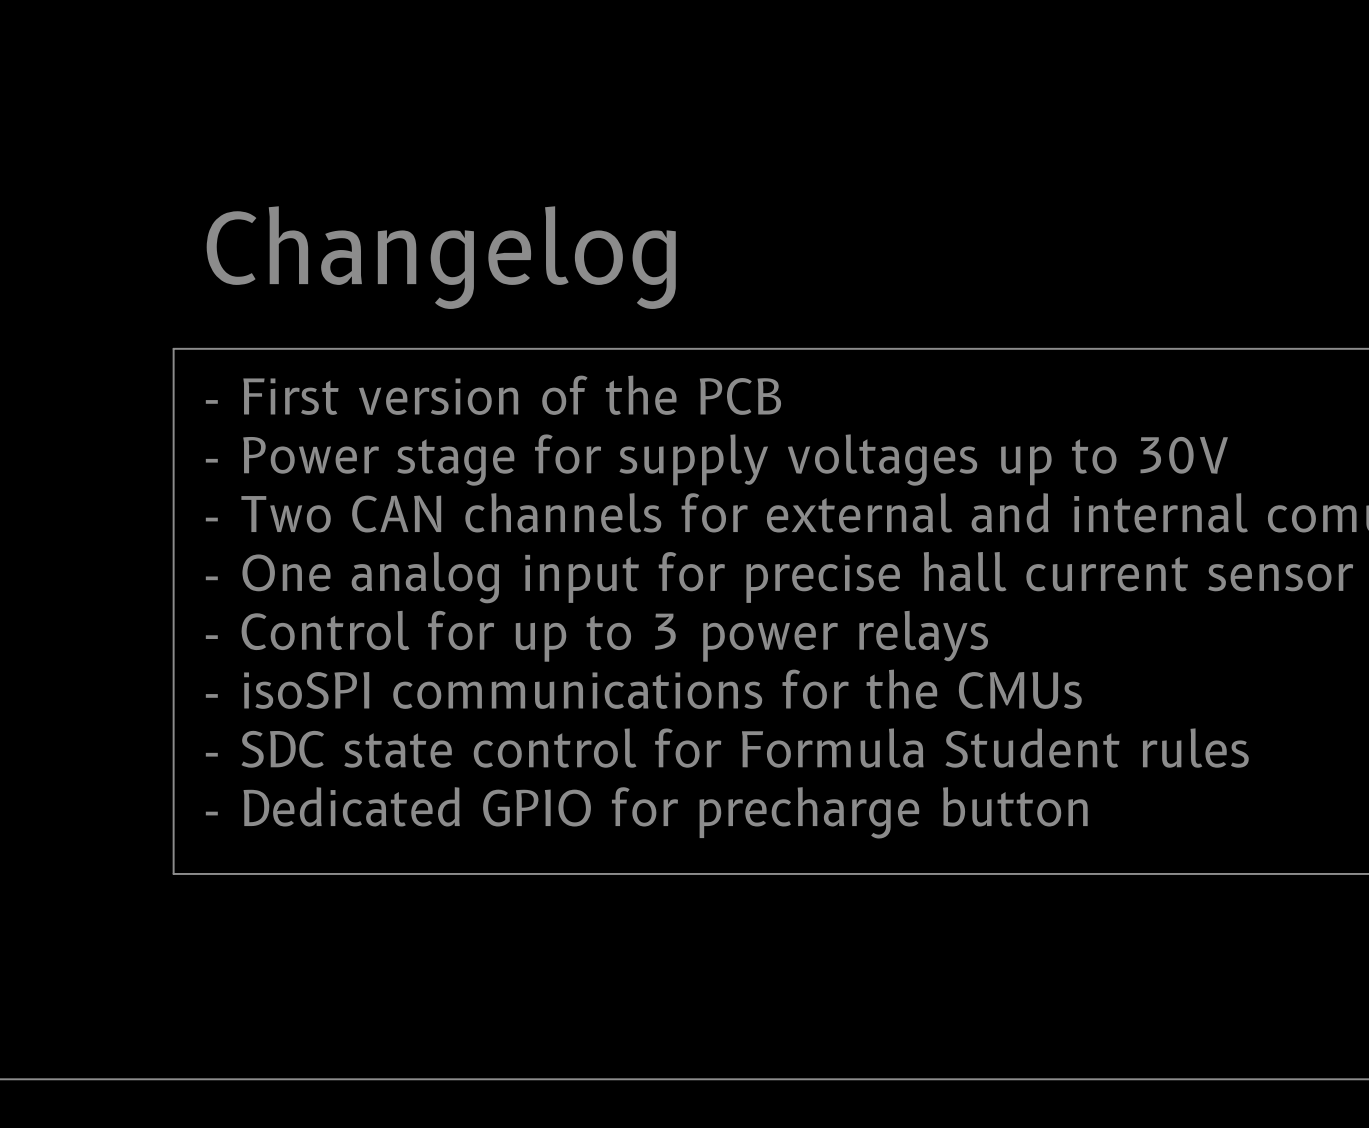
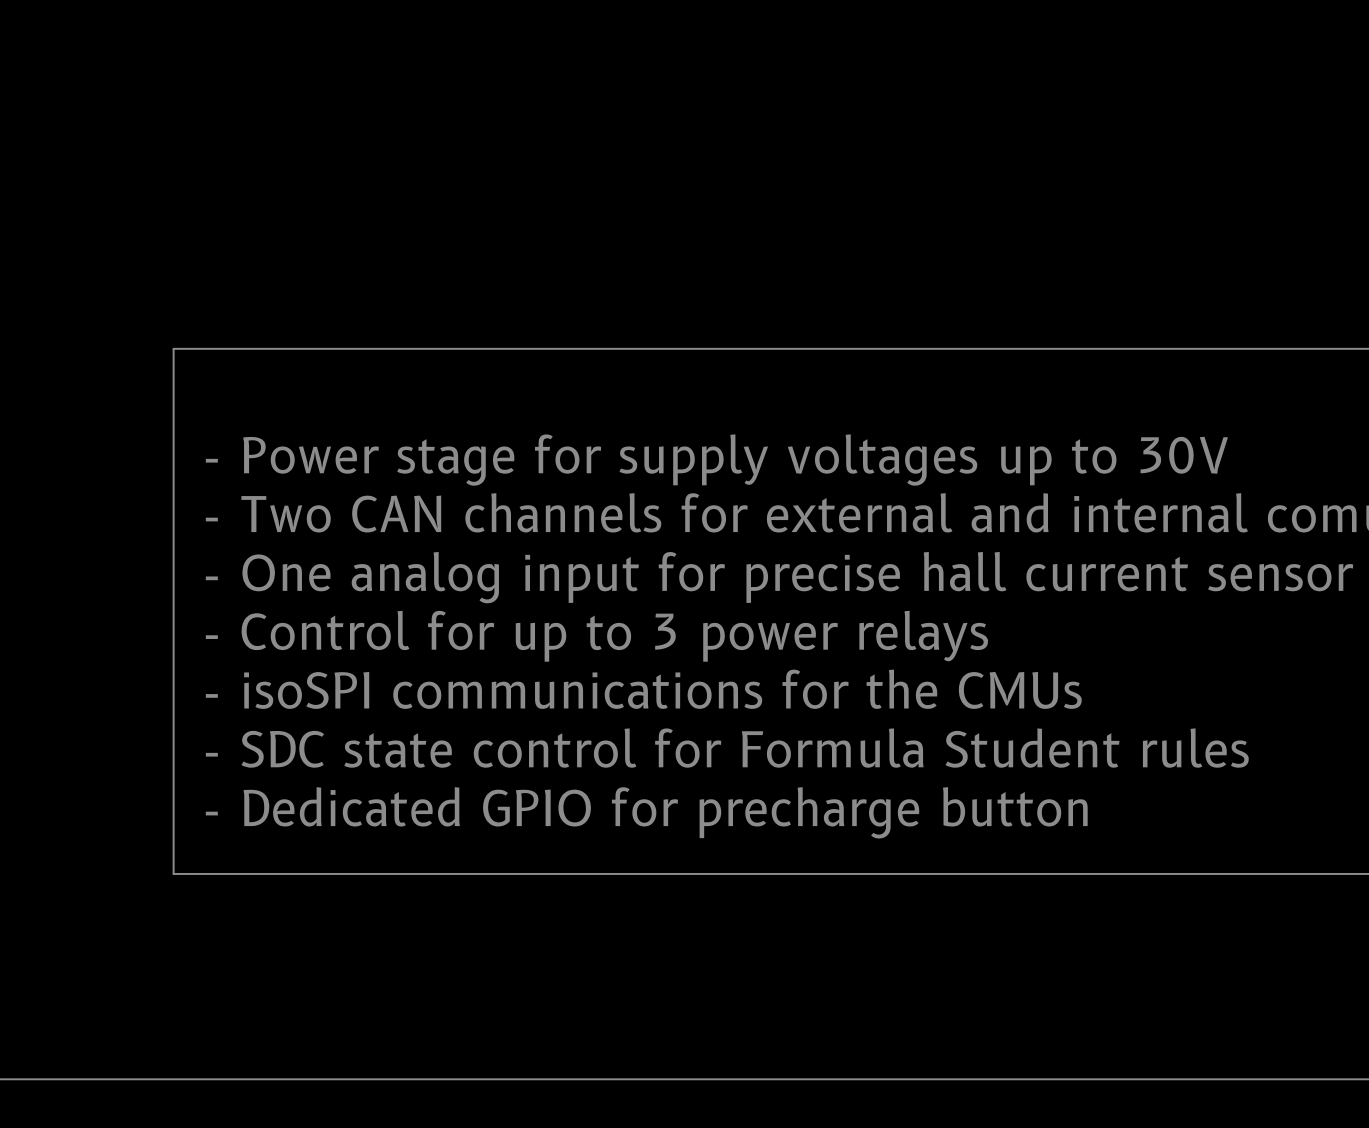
text: Changelog (441, 257) -> none
text: - First version of the PCB (493, 395) -> none

